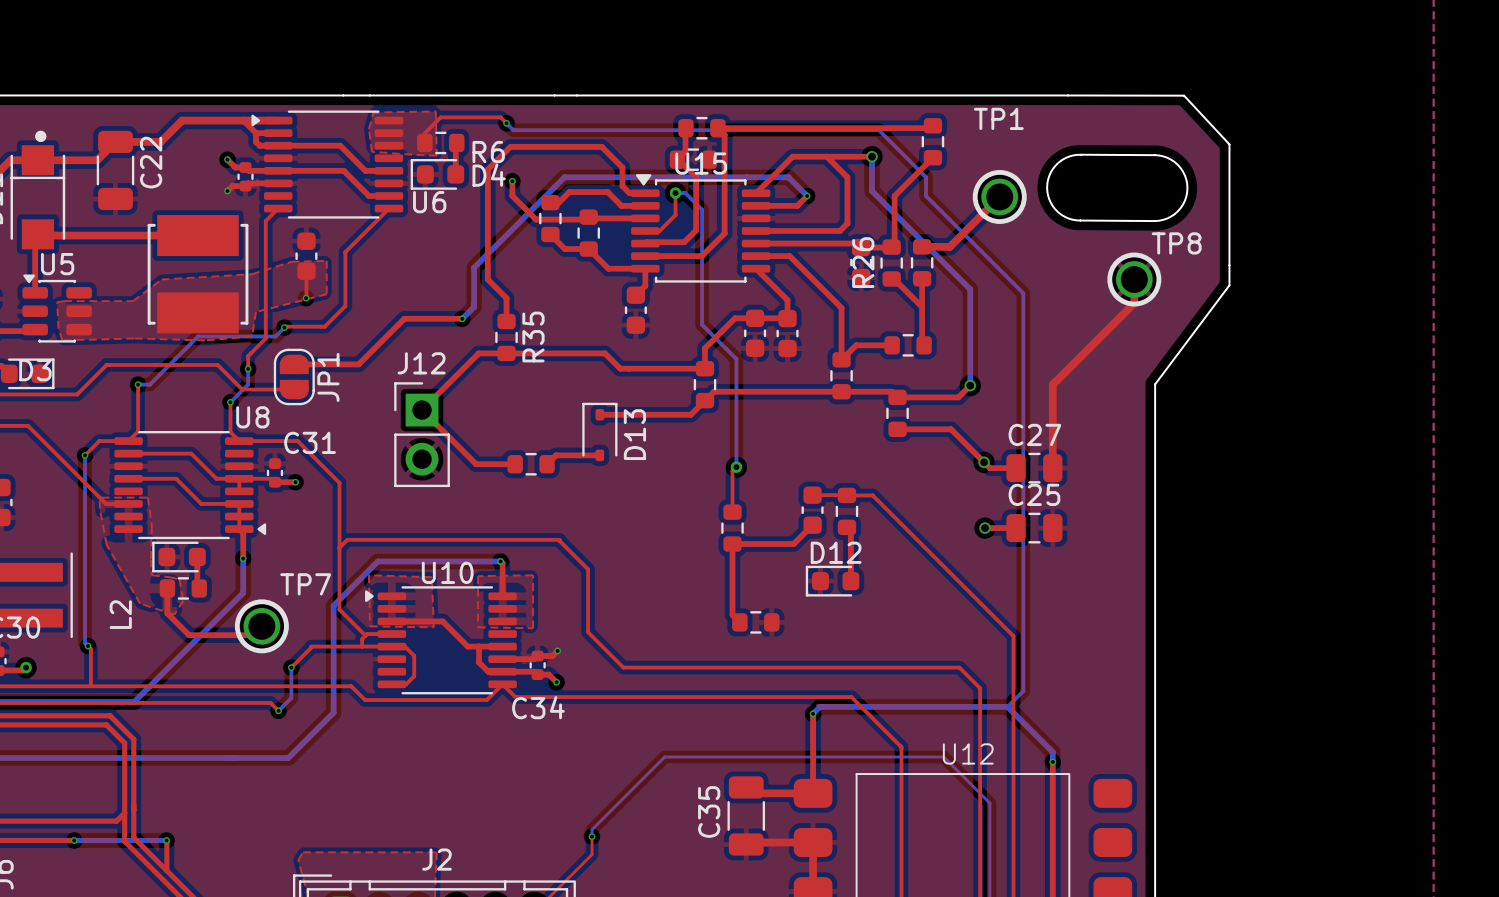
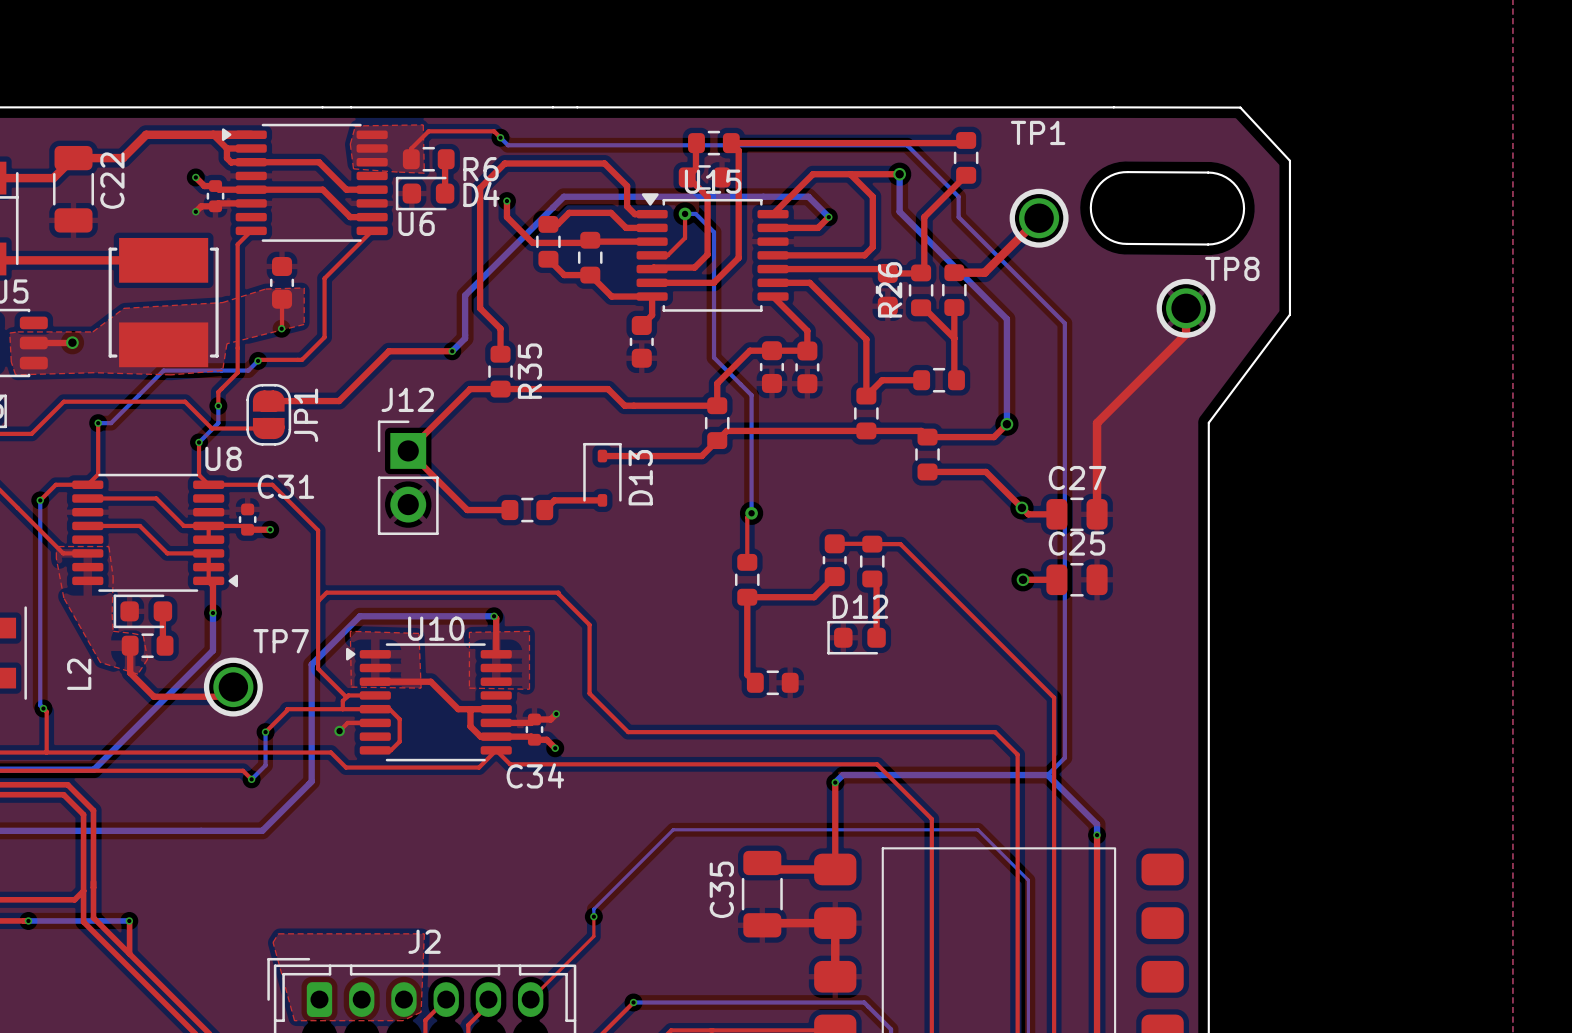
top track: none -> (72, 342) (33, 343)
via: none -> (72, 342)
top track: none -> (375, 722) (347, 722) (339, 731)
via: none -> (339, 731)
U12 name: U12 (968, 753) -> none

